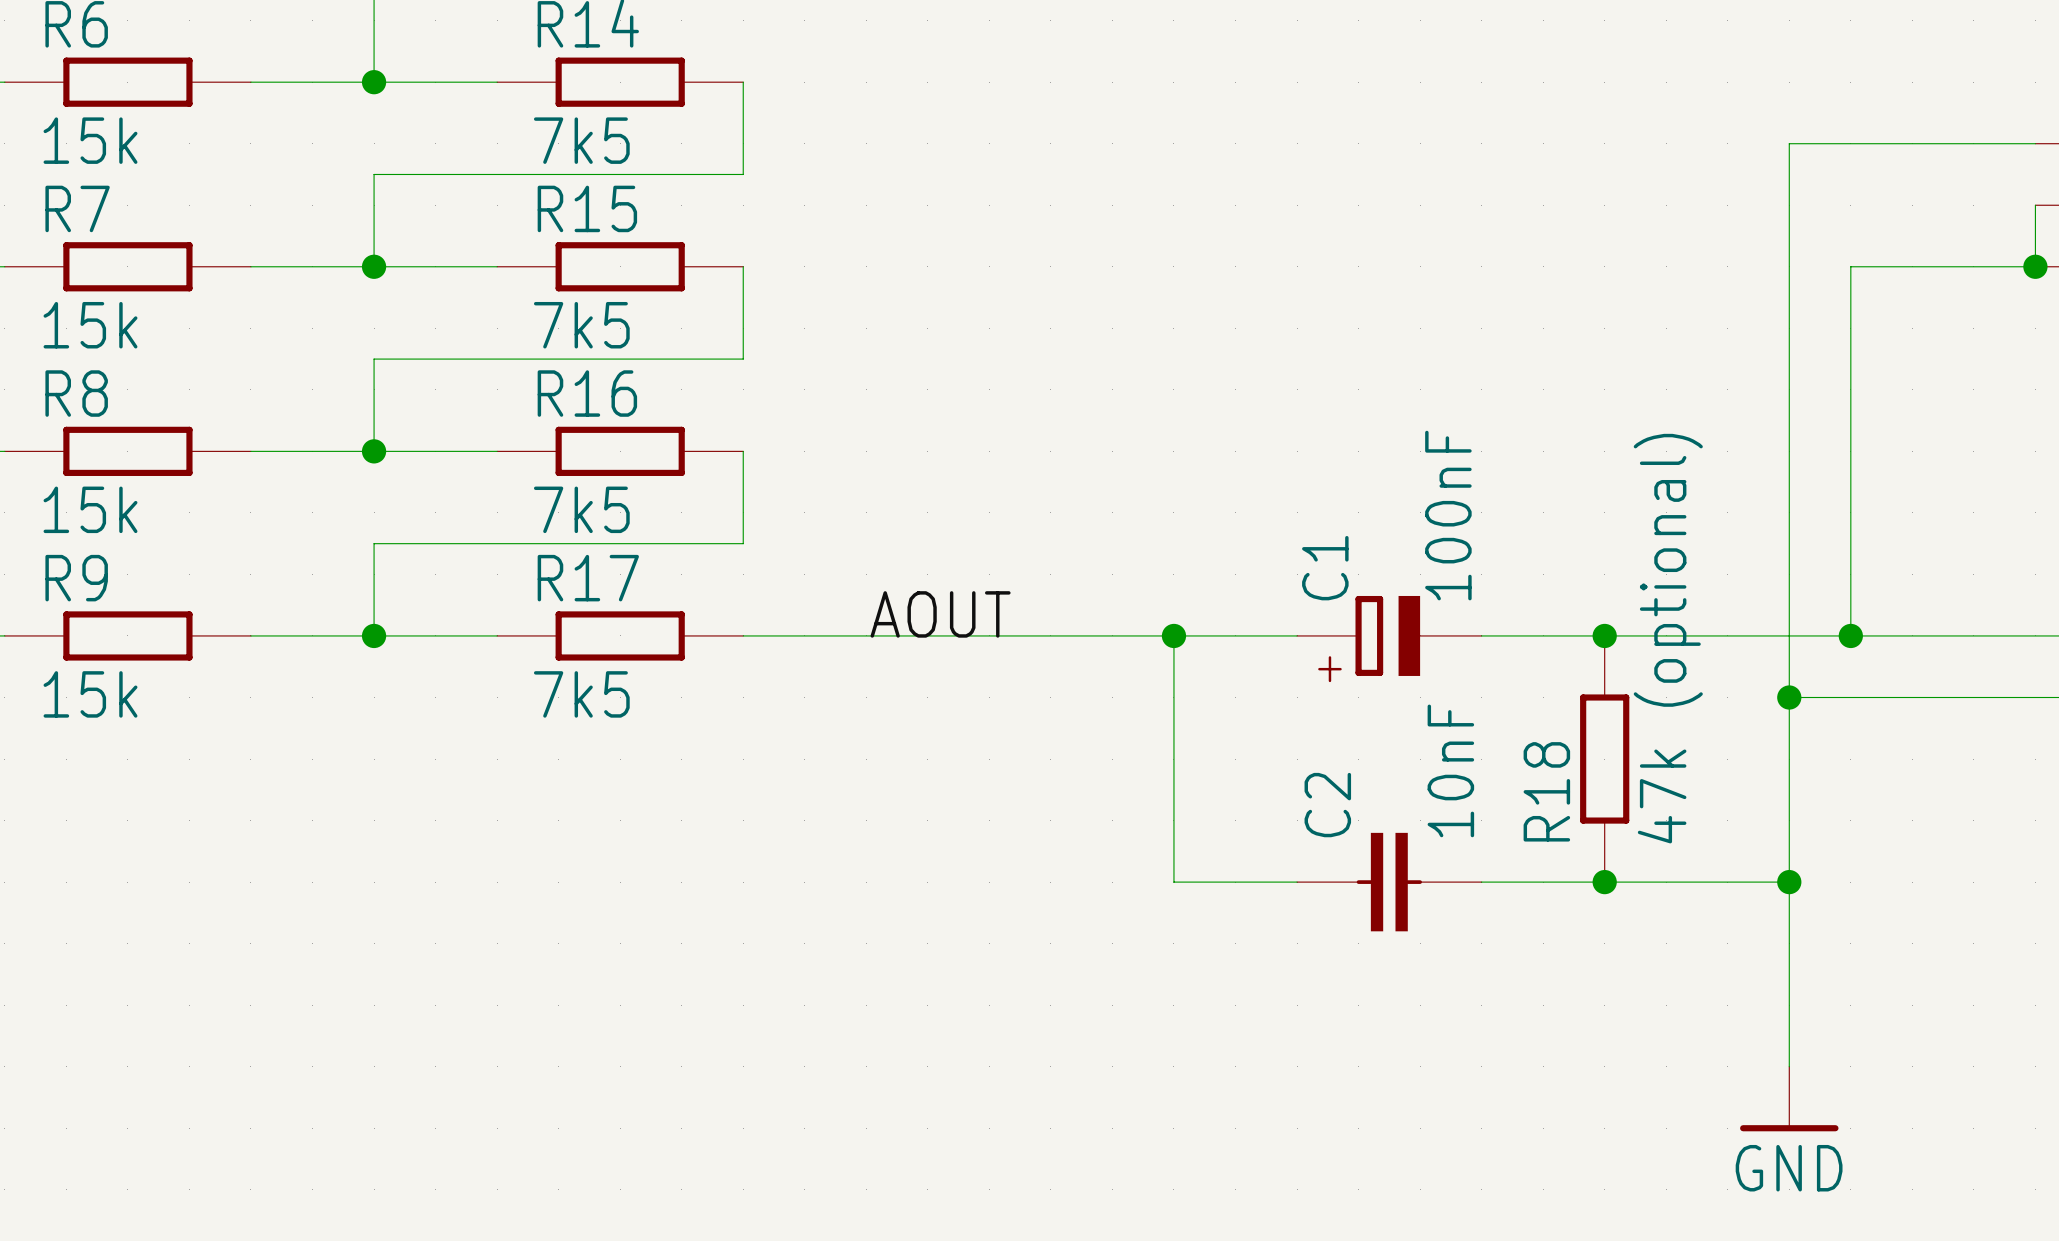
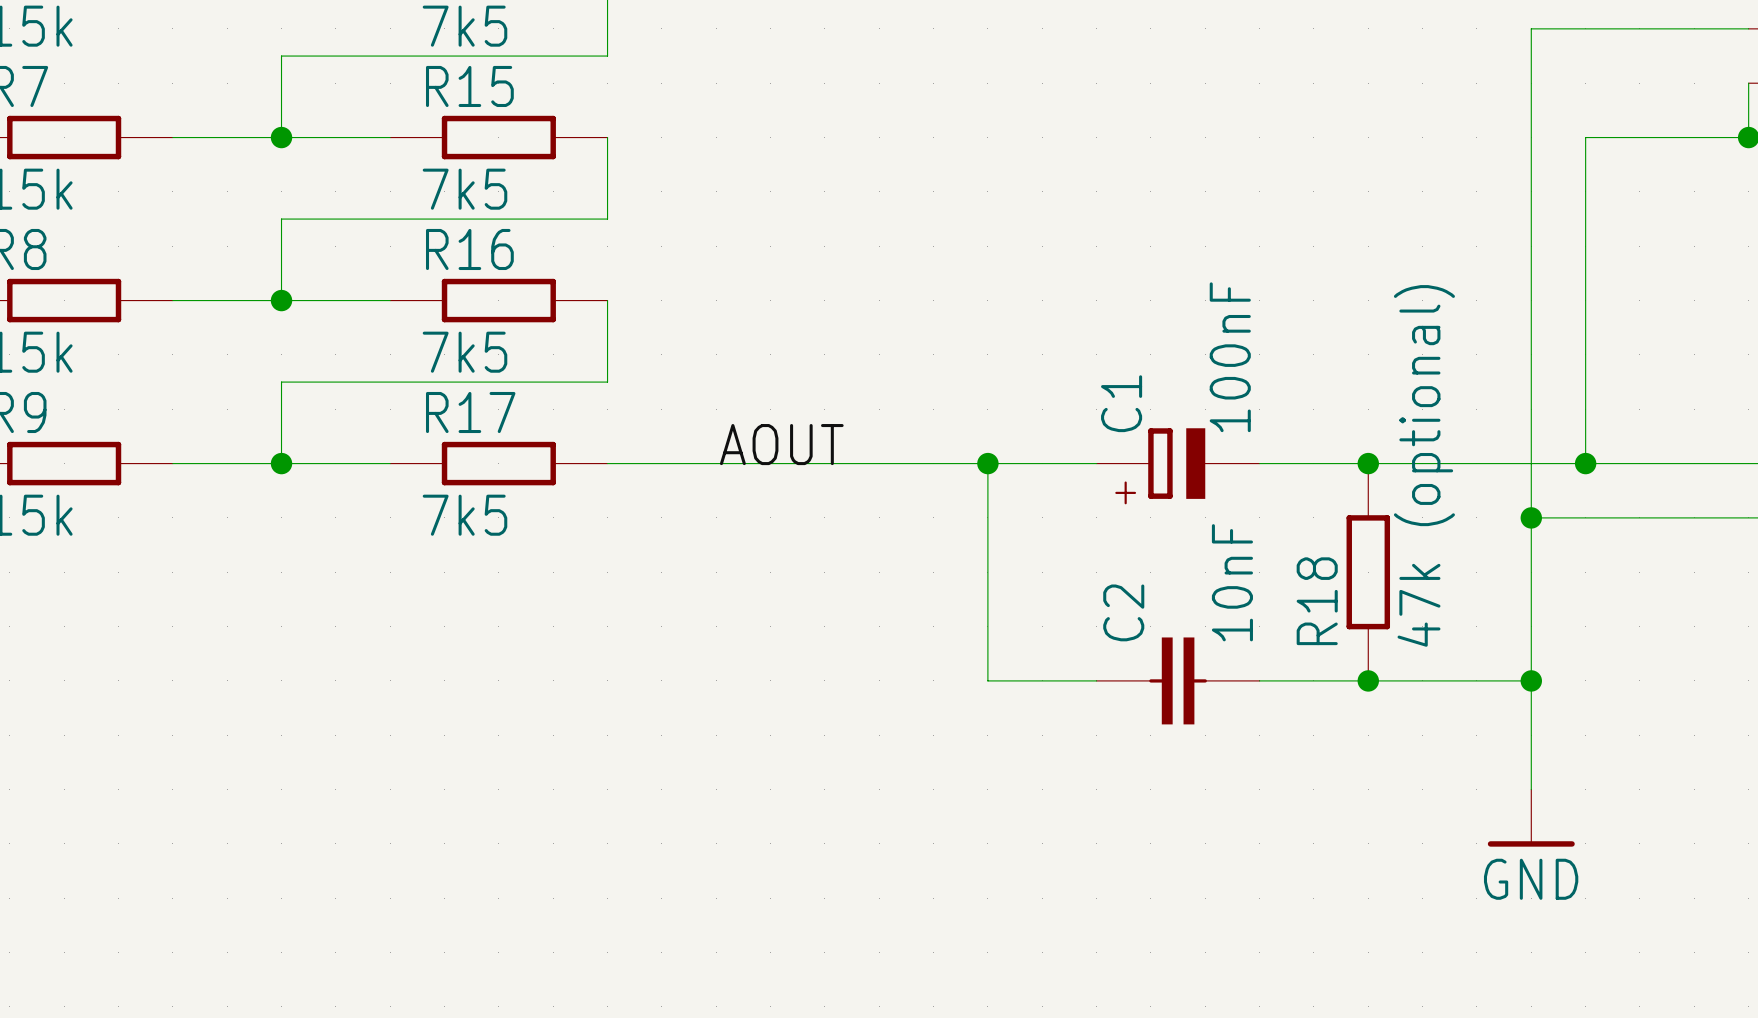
power symbol position: GND (1789, 1098) -> GND (1531, 818)

